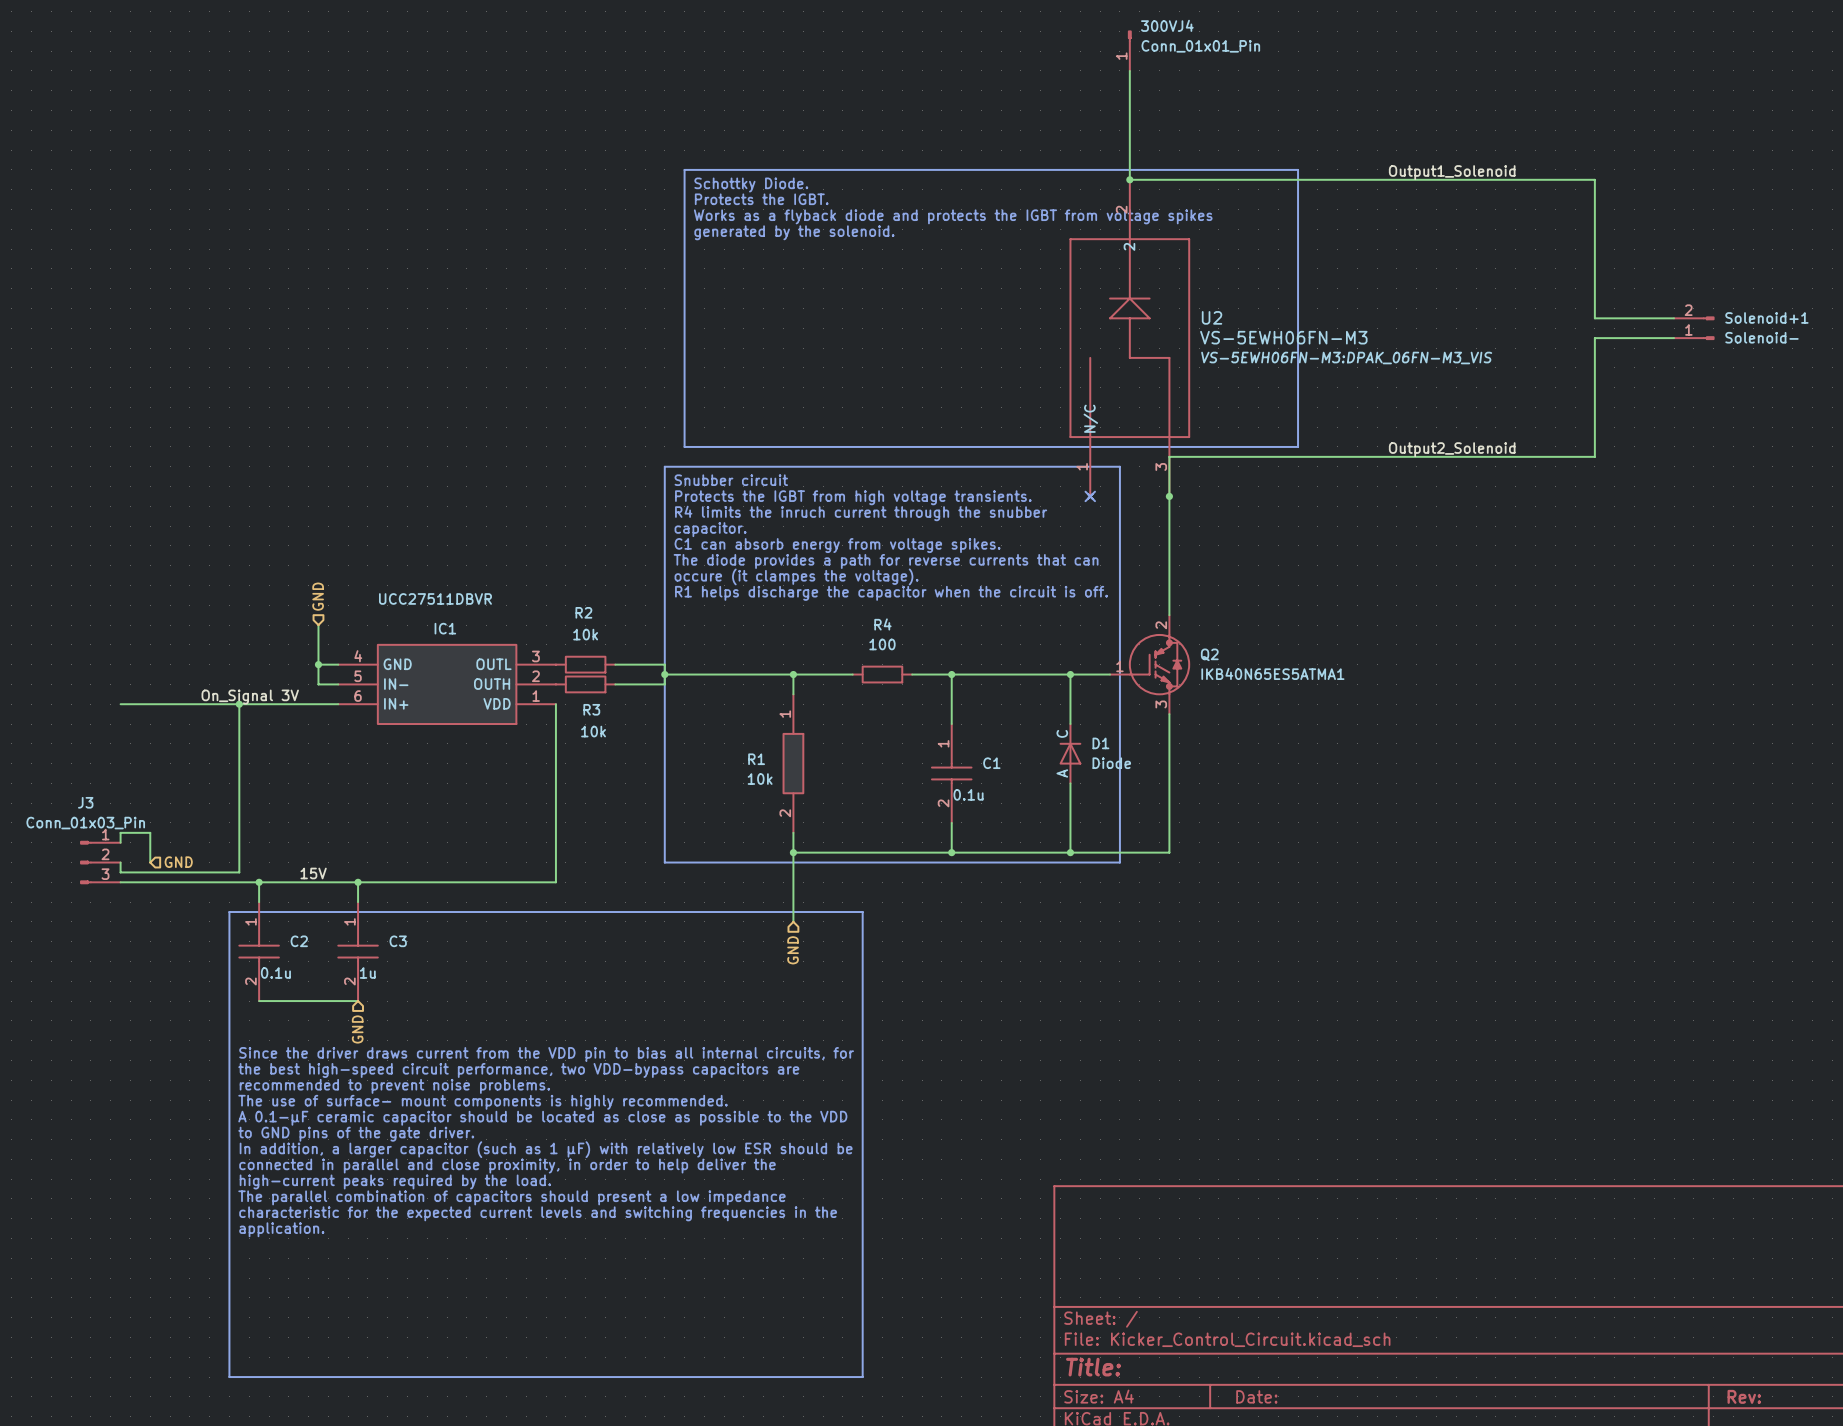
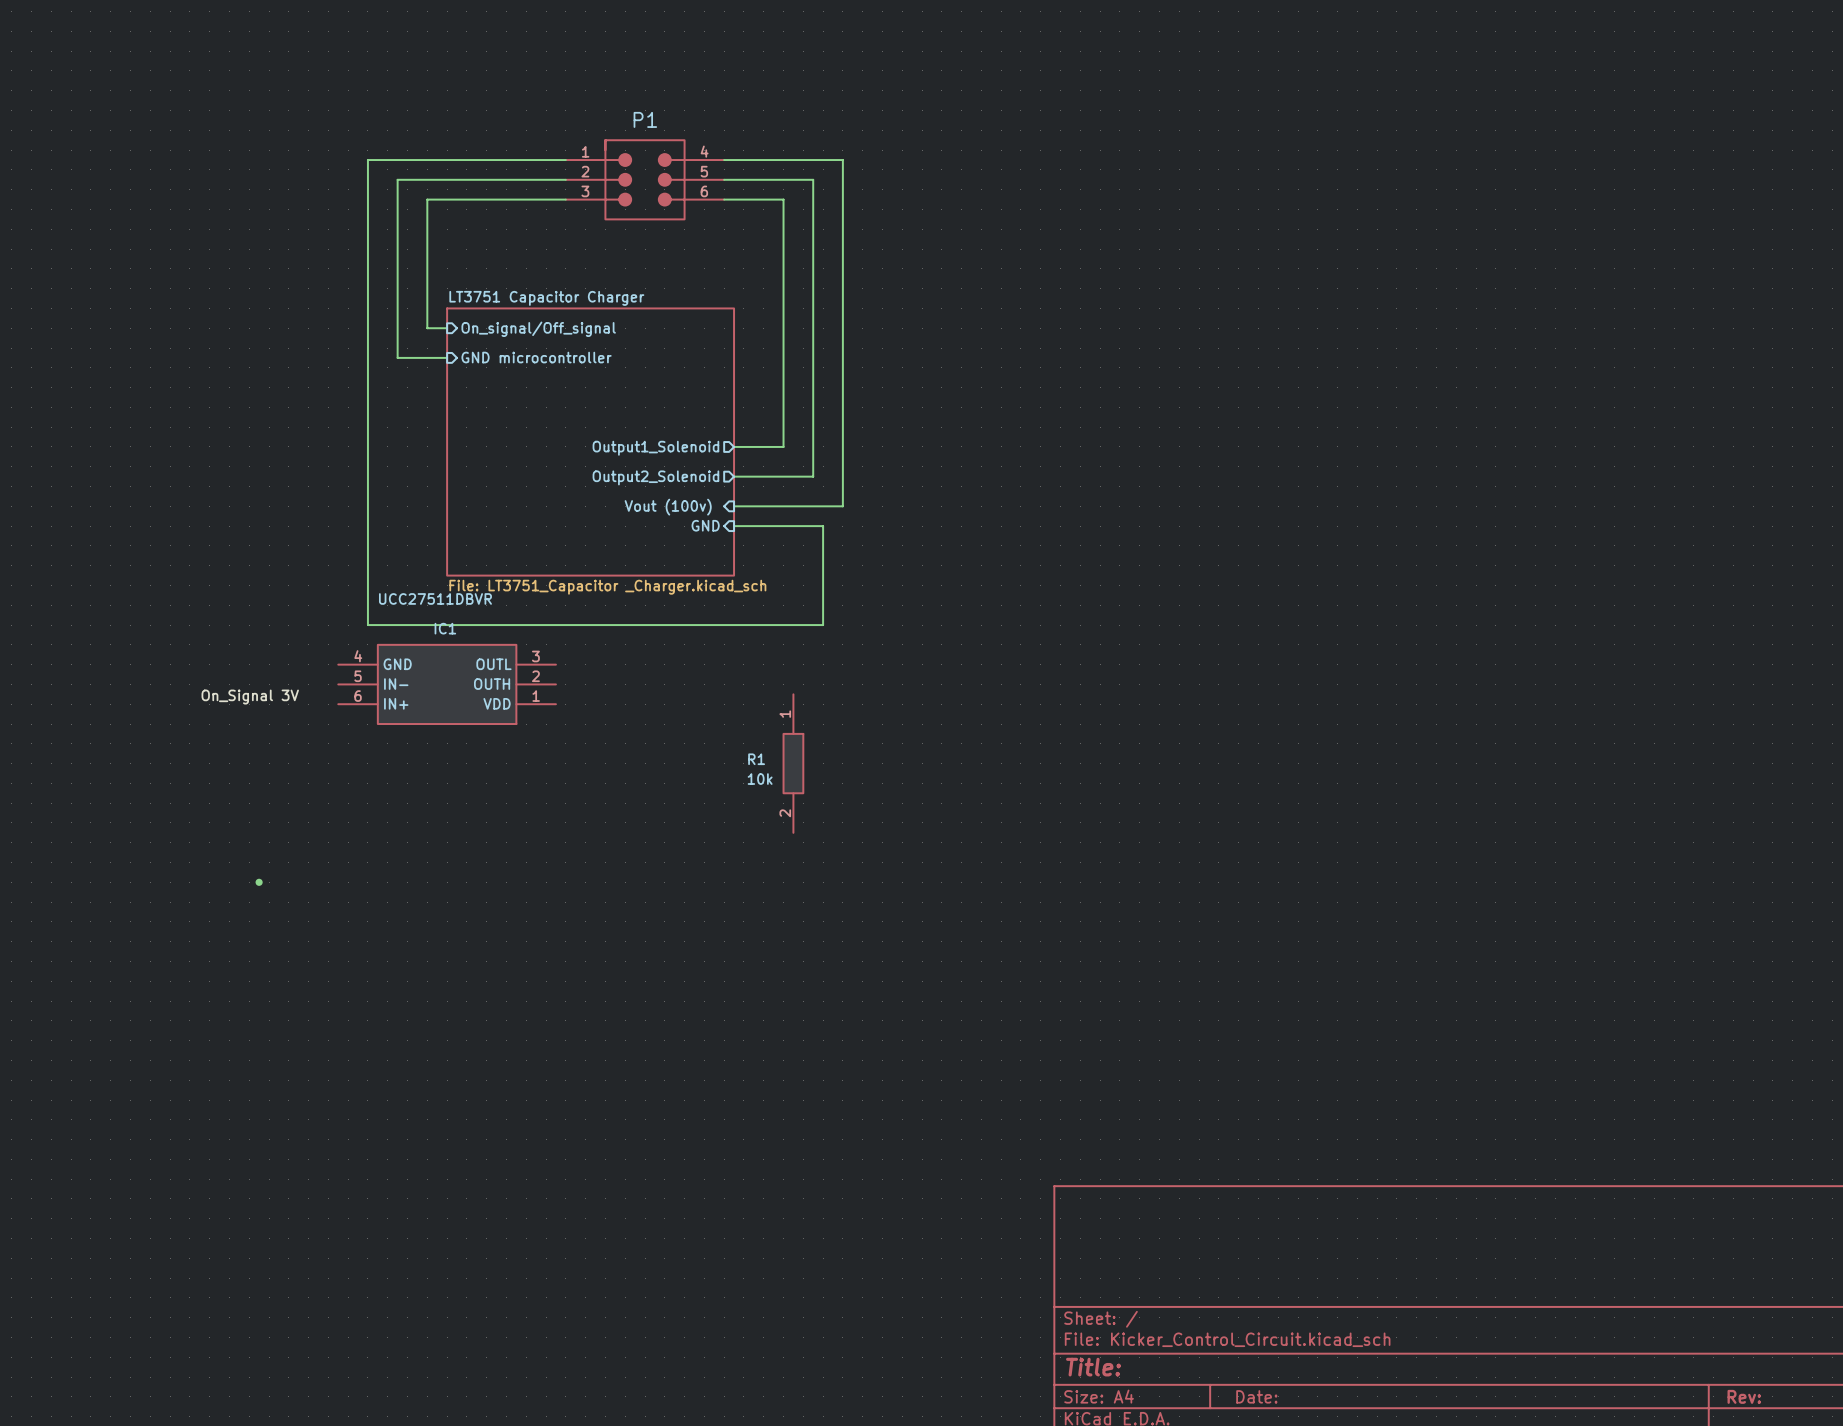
300VJ4: Conn_01x01_Pin (1129, 50) -> none
wire: (1129, 70) (1129, 179) (1594, 179) (1594, 318) (1674, 318) -> none
wire: none -> (565, 160) (367, 160) (367, 625) (823, 625) (823, 526) (734, 526)
wire: none -> (724, 160) (842, 160) (842, 506) (734, 506)
line: (684, 169) (1298, 169) (1298, 446) (684, 446) (684, 169) -> none
label: Output1_Solenoid (1452, 172) -> none
wire: none -> (565, 179) (397, 179) (397, 357) (447, 357)
P1: none -> (645, 179)
wire: none -> (724, 179) (813, 179) (813, 476) (734, 476)
junction: (1129, 179) -> none
text: Schottky Diode. (751, 184) -> none
wire: none -> (565, 199) (427, 199) (427, 328) (447, 328)
wire: none -> (724, 199) (783, 199) (783, 446) (734, 446)
text: Protects the IGBT. (761, 199) -> none
text: Works as a flyback diode and protects the IGBT from voltage spikes (953, 216) -> none
text: generated by the solenoid. (794, 232) -> none
Solenoid+1: Solenoid- (1694, 328) -> none
sheet pin: none -> On_signal/Off_signal (538, 329)
wire: (1674, 338) (1594, 338) (1594, 456) (1169, 456) (1169, 615) -> none
U2: VS-5EWH06FN-M3 (1129, 339) -> none
sheet pin: none -> GND microcontroller (536, 357)
sheet LT3751 Capacitor Charger: none -> File: LT3751_Capacitor _Charger.kicad_sch (590, 442)
sheet pin: none -> Output1_Solenoid (655, 448)
label: Output2_Solenoid (1452, 449) -> none
line: (664, 466) (1119, 466) (1119, 862) (664, 862) (664, 466) -> none
sheet pin: none -> Output2_Solenoid (655, 477)
text: Snubber circuit (731, 480) -> none
no-connect mark: (1090, 496) -> none
junction: (1169, 496) -> none
text: Protects the IGBT from high voltage transients. (853, 497) -> none
sheet pin: none -> Vout (100v) (668, 507)
text: R4 limits the inruch current through the snubber (861, 513) -> none
sheet pin: none -> GND (705, 525)
text: capacitor. (710, 529) -> none
text: C1 can absorb energy from voltage spikes. (837, 545) -> none
text: The diode provides a path for reverse currents that can (886, 561) -> none
text: occure (it clampes the voltage). (796, 576) -> none
text: R1 helps discharge the capacitor when the circuit is off. (891, 593) -> none
hierarchical label: GND (318, 596) -> none
wire: (318, 625) (318, 684) (338, 684) -> none
wire: (318, 664) (338, 664) -> none
junction: (318, 664) -> none
R2: 10k (585, 664) -> none
wire: (615, 664) (664, 664) (664, 684) (615, 684) -> none
Q2: IKB40N65ES5ATMA1 (1150, 664) -> none
wire: (664, 674) (852, 674) -> none
junction: (664, 674) -> none
wire: (793, 674) (793, 694) -> none
junction: (793, 674) -> none
R4: 100 (882, 674) -> none
wire: (912, 674) (1110, 674) -> none
wire: (951, 674) (951, 724) -> none
junction: (951, 674) -> none
wire: (1070, 674) (1070, 724) -> none
junction: (1070, 674) -> none
R3: 10k (585, 684) -> none
wire: (120, 704) (338, 704) -> none
wire: (239, 704) (239, 872) (120, 872) (120, 862) -> none
junction: (239, 704) -> none
wire: (555, 704) (555, 882) (120, 882) -> none
wire: (1169, 714) (1169, 852) (793, 852) -> none
D1: Diode (1070, 753) -> none
C1: 0.1u (951, 773) -> none
wire: (1070, 783) (1070, 852) -> none
wire: (951, 822) (951, 852) -> none
wire: (793, 832) (793, 921) -> none
wire: (120, 842) (120, 832) (150, 832) (150, 862) -> none
junction: (793, 852) -> none
junction: (951, 852) -> none
junction: (1070, 852) -> none
J3: Conn_01x03_Pin (100, 862) -> none
hierarchical label: GND (178, 862) -> none
label: 15V (313, 873) -> none
wire: (259, 882) (259, 902) -> none
wire: (358, 882) (358, 902) -> none
junction: (358, 882) -> none
line: (229, 912) (862, 912) (862, 1377) (229, 1377) (229, 912) -> none
hierarchical label: GND (793, 950) -> none
C2: 0.1u (259, 951) -> none
C3: 1u (358, 951) -> none
wire: (259, 1001) (358, 1001) -> none
hierarchical label: GND (357, 1029) -> none
text: Since the driver draws current from the VDD pin to bias all internal circuits, for (546, 1054) -> none
text: the best high-speed circuit performance, two VDD-bypass capacitors are (518, 1070) -> none
text: recommended to prevent noise problems. (394, 1086) -> none
text: The use of surface- mount components is highly recommended. (482, 1102) -> none
text: A 0.1-μF ceramic capacitor should be located as close as possible to the VDD (542, 1118) -> none
text: to GND pins of the gate driver. (356, 1134) -> none
text: In addition, a larger capacitor (such as 1 μF) with relatively low ESR should be (546, 1149) -> none
text: connected in parallel and close proximity, in order to help deliver the (507, 1166) -> none
text: high-current peaks required by the load. (395, 1181) -> none
text: The parallel combination of capacitors should present a low impedance (511, 1197) -> none
text: characteristic for the expected current levels and switching frequencies in the (538, 1213) -> none
text: application. (281, 1229) -> none

